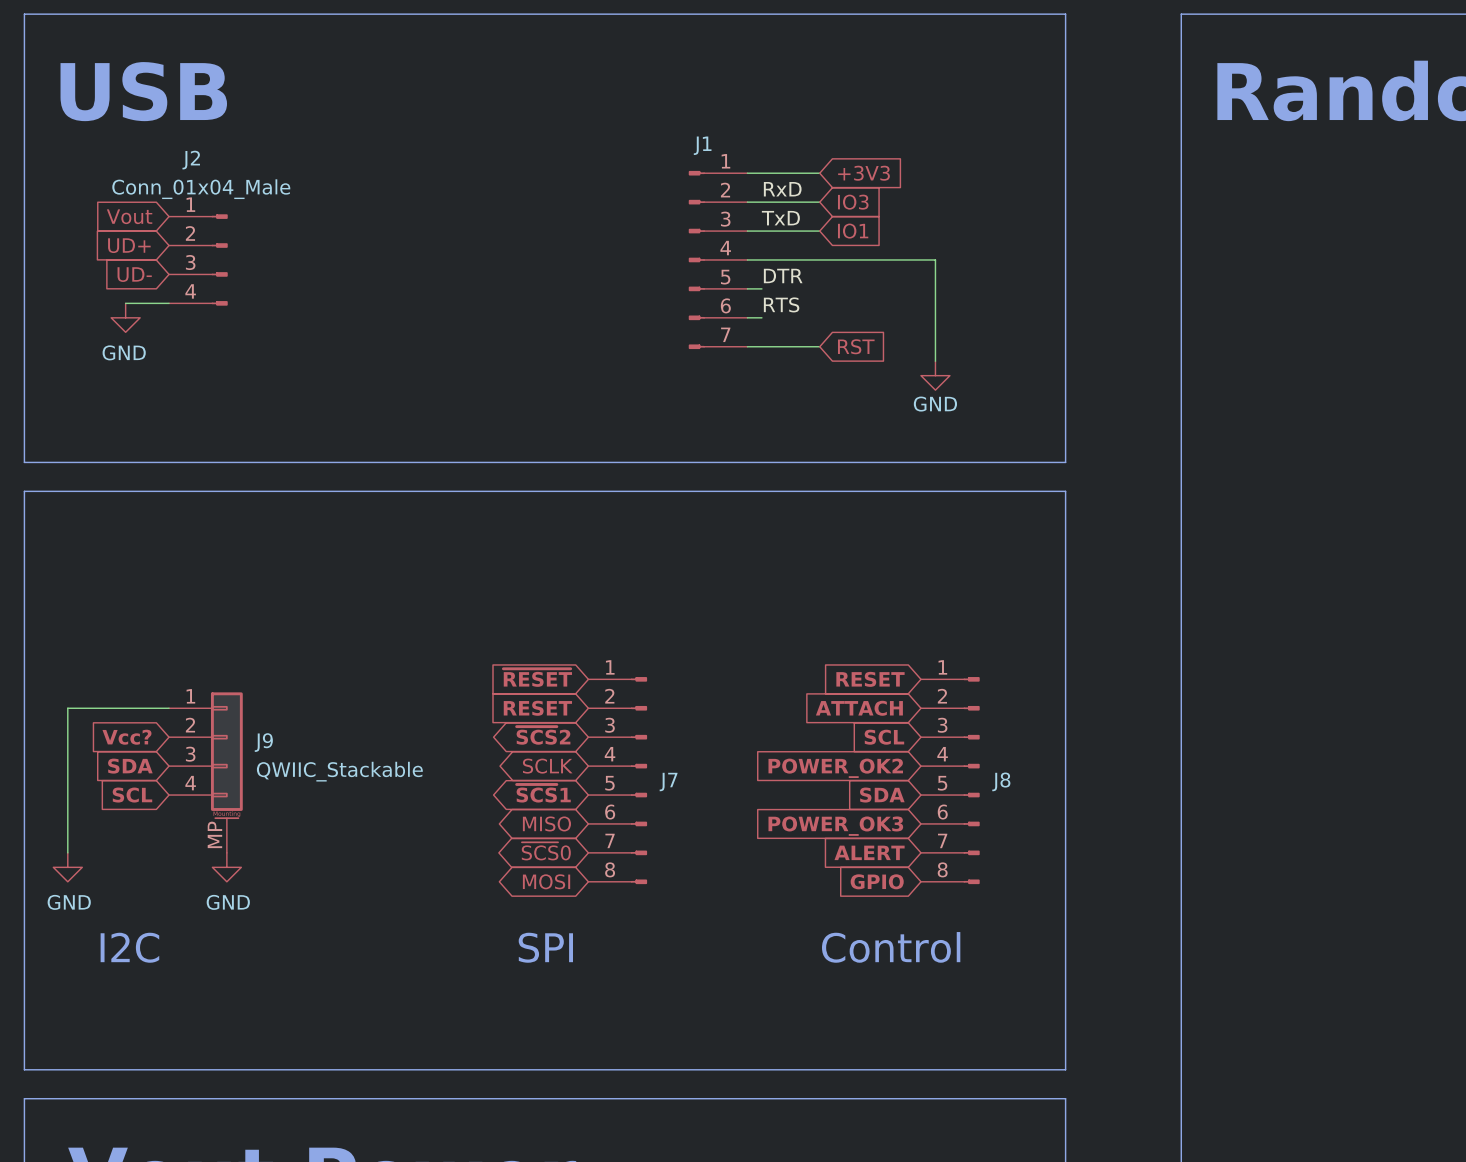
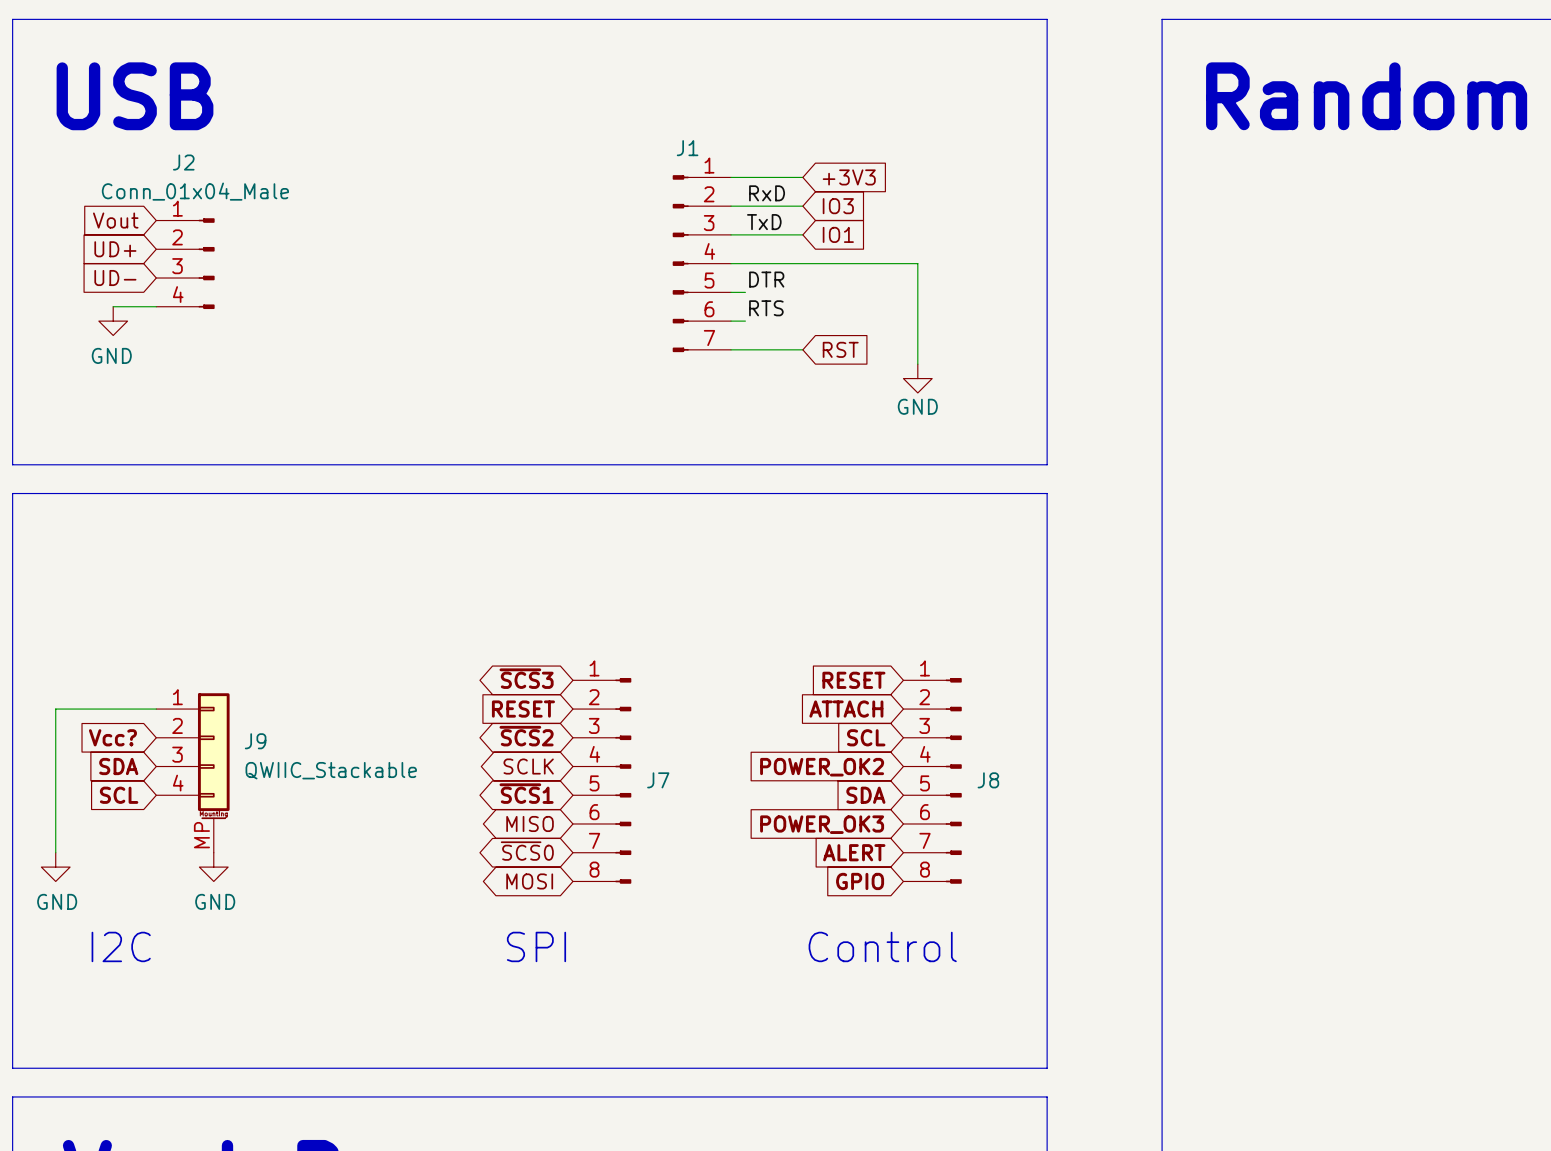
global label shape: input (537, 677) -> bidirectional (526, 678)
global label: ~{RESET} (537, 677) -> ~{SCS}3 (526, 678)

